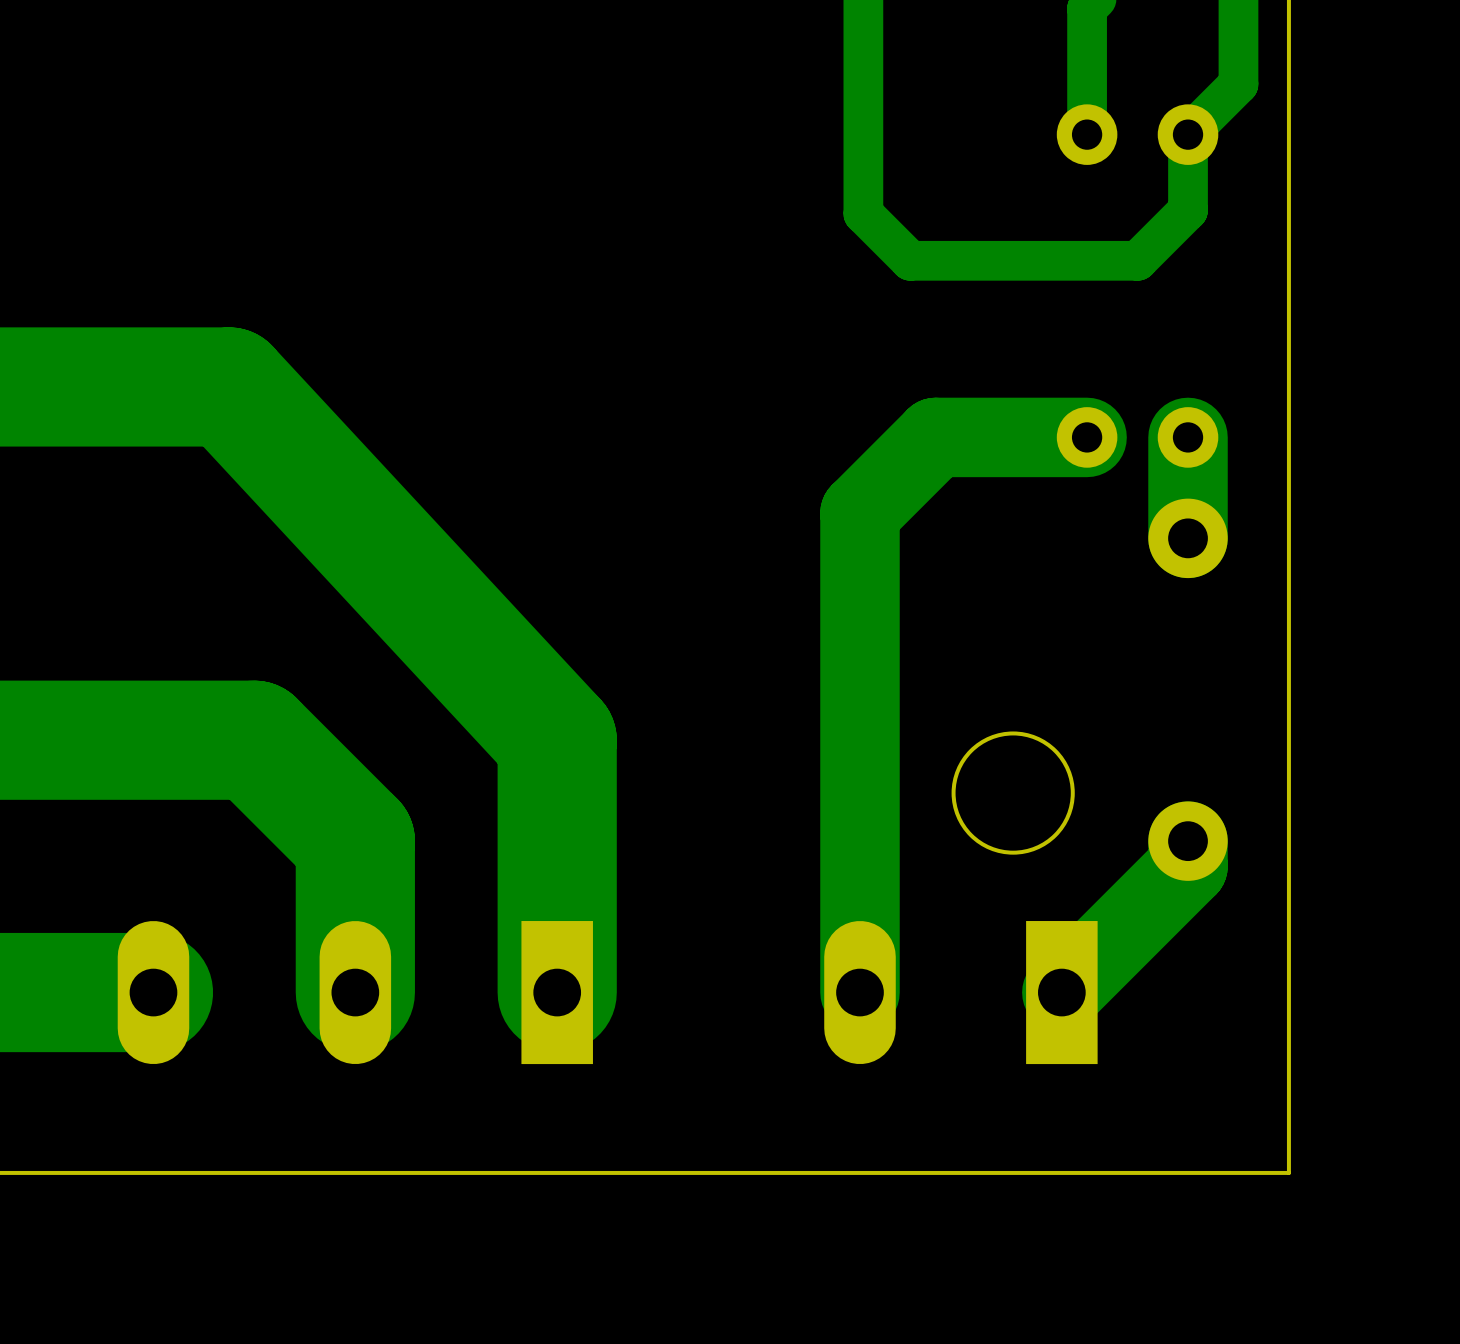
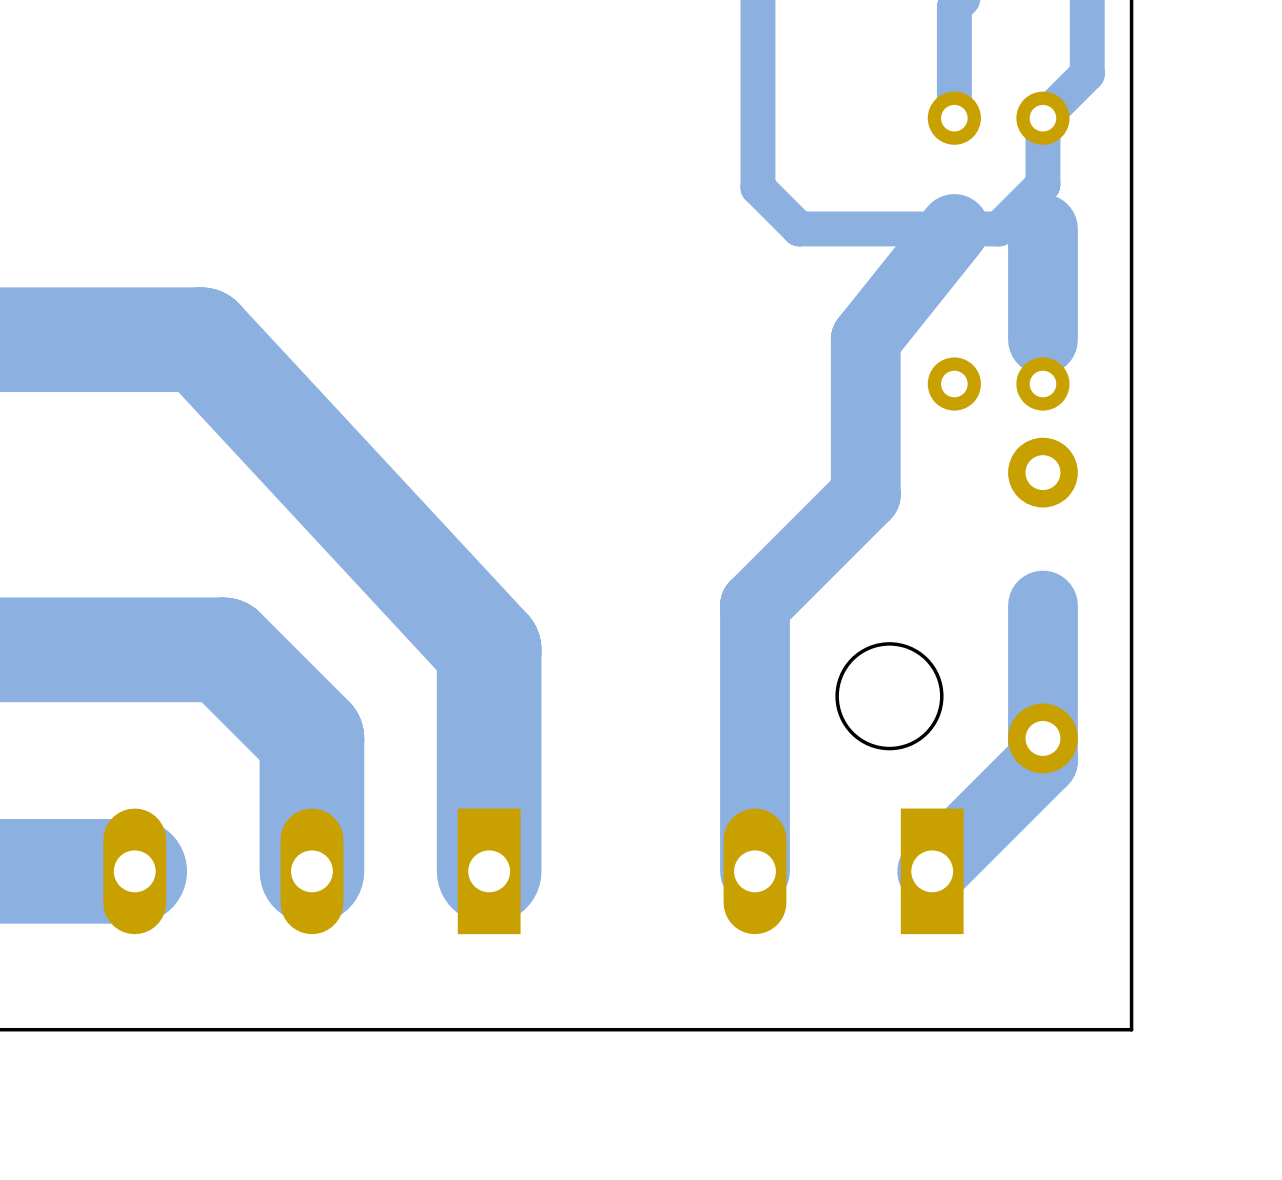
bottom track: none -> (1042, 228) (1042, 339)
bottom track: (1087, 437) (935, 437) (859, 513) (859, 689) -> (954, 228) (865, 339) (865, 494) (754, 605)
bottom track: (1188, 437) (1188, 538) -> none
bottom track: none -> (1042, 605) (1042, 738)

